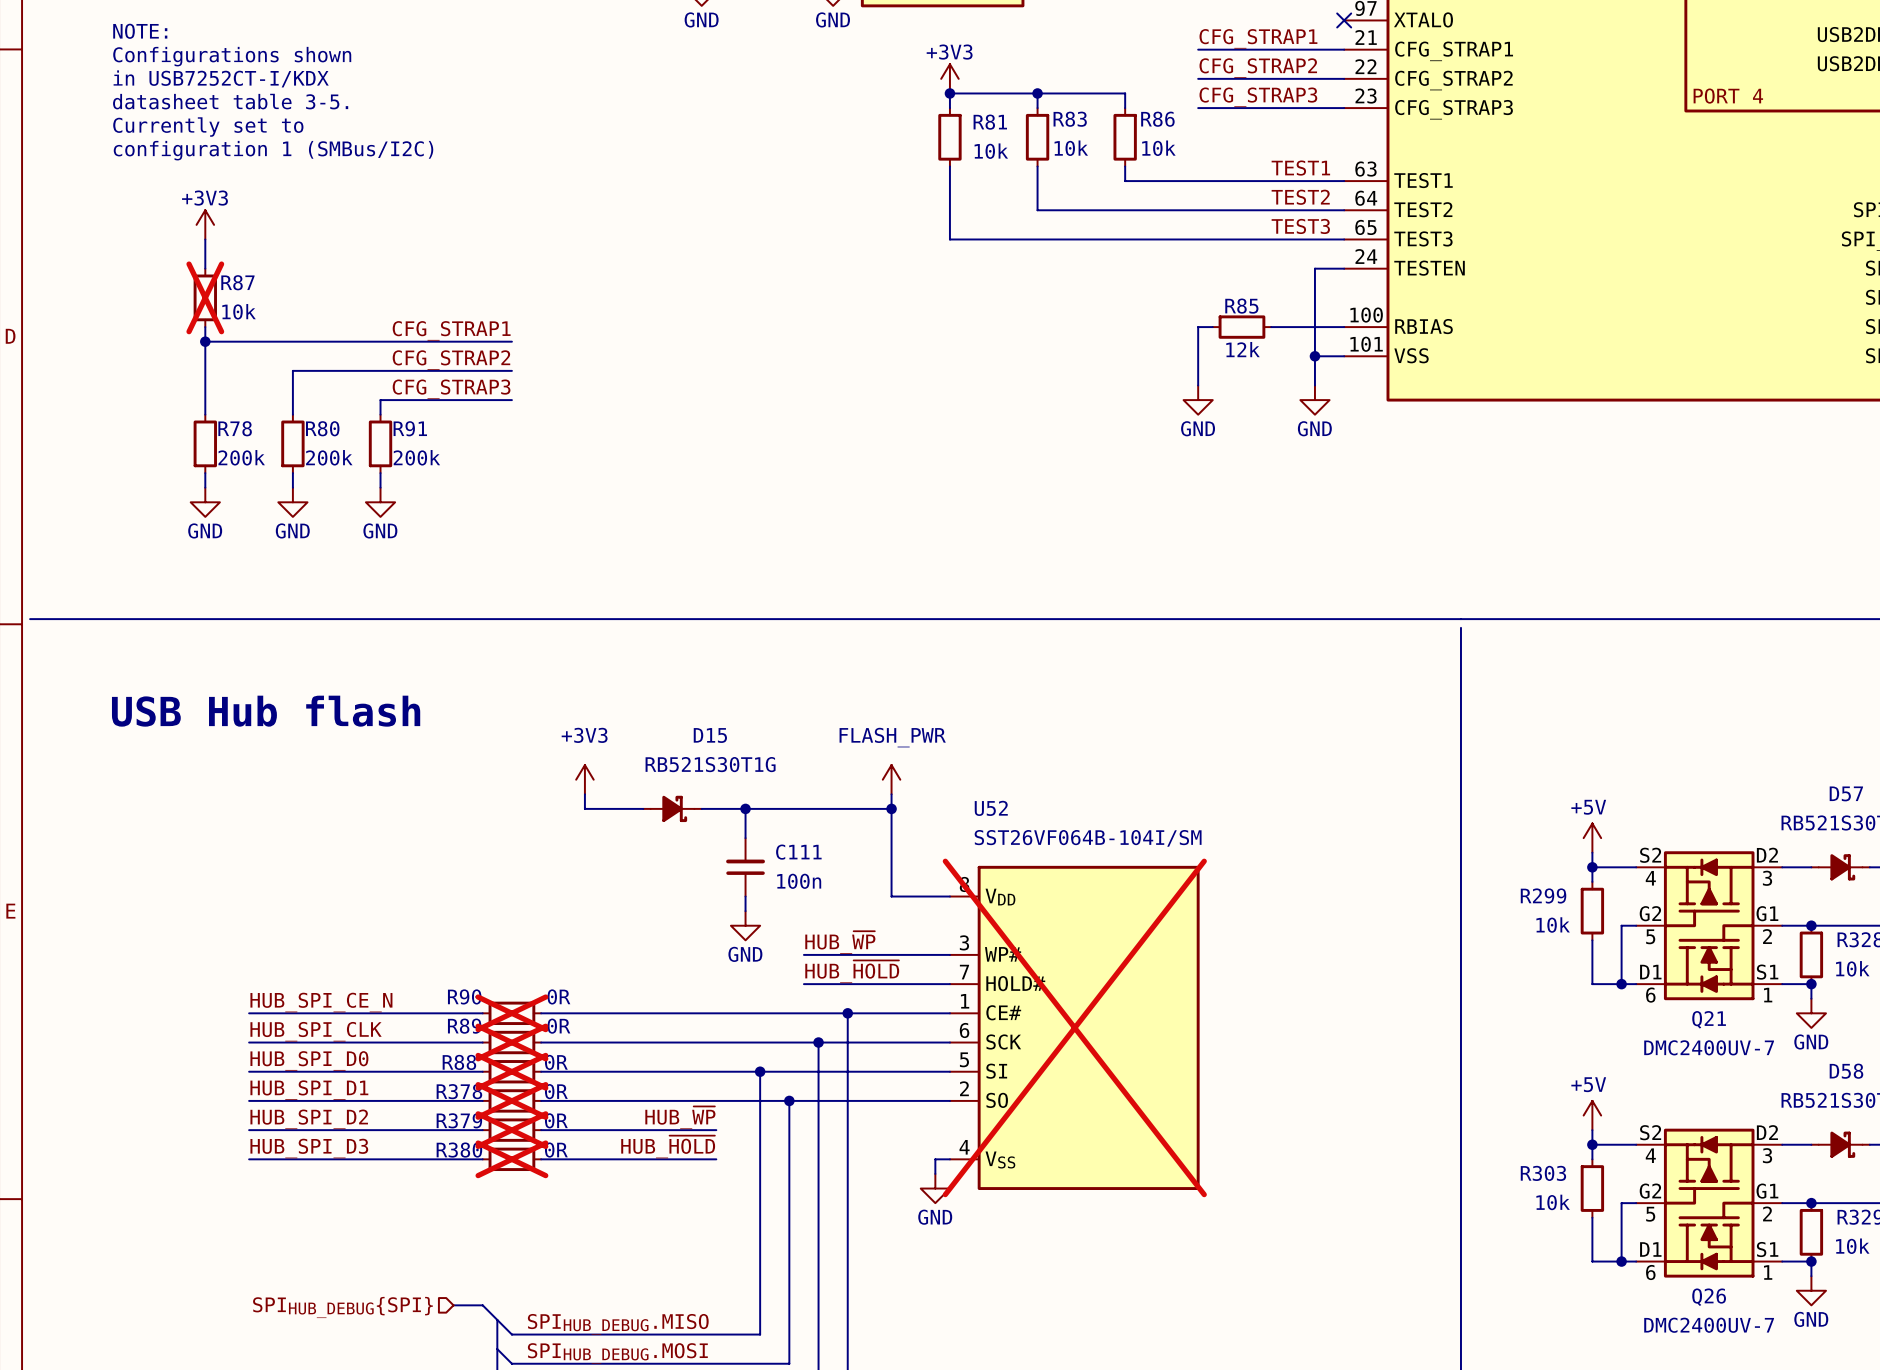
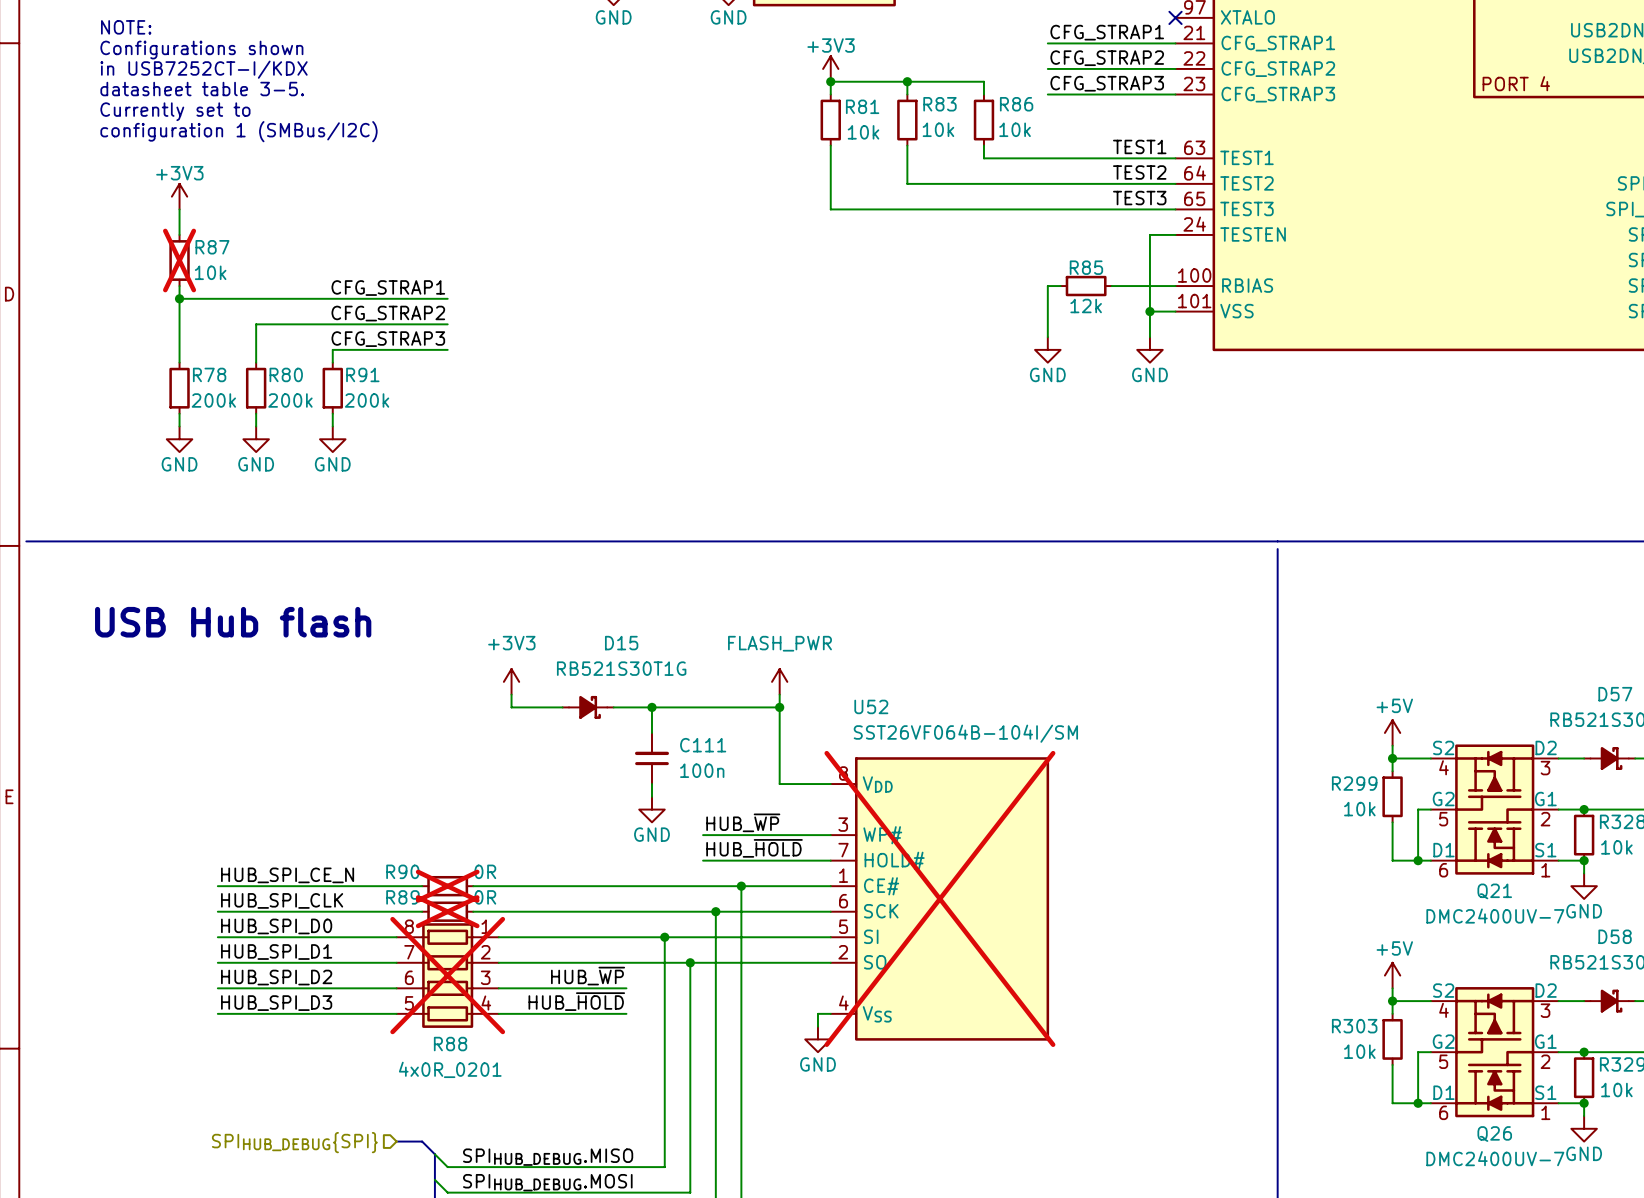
R88 symbol: [482, 1060, 542, 1084] -> [396, 923, 499, 1028]
R88 name position: R88 (459, 1062) -> R88 (450, 1044)
R88 text: 0R (556, 1062) -> 4x0R_0201 (450, 1069)
R378: (511, 1100) -> none
R379: (511, 1130) -> none
R380: (511, 1159) -> none

